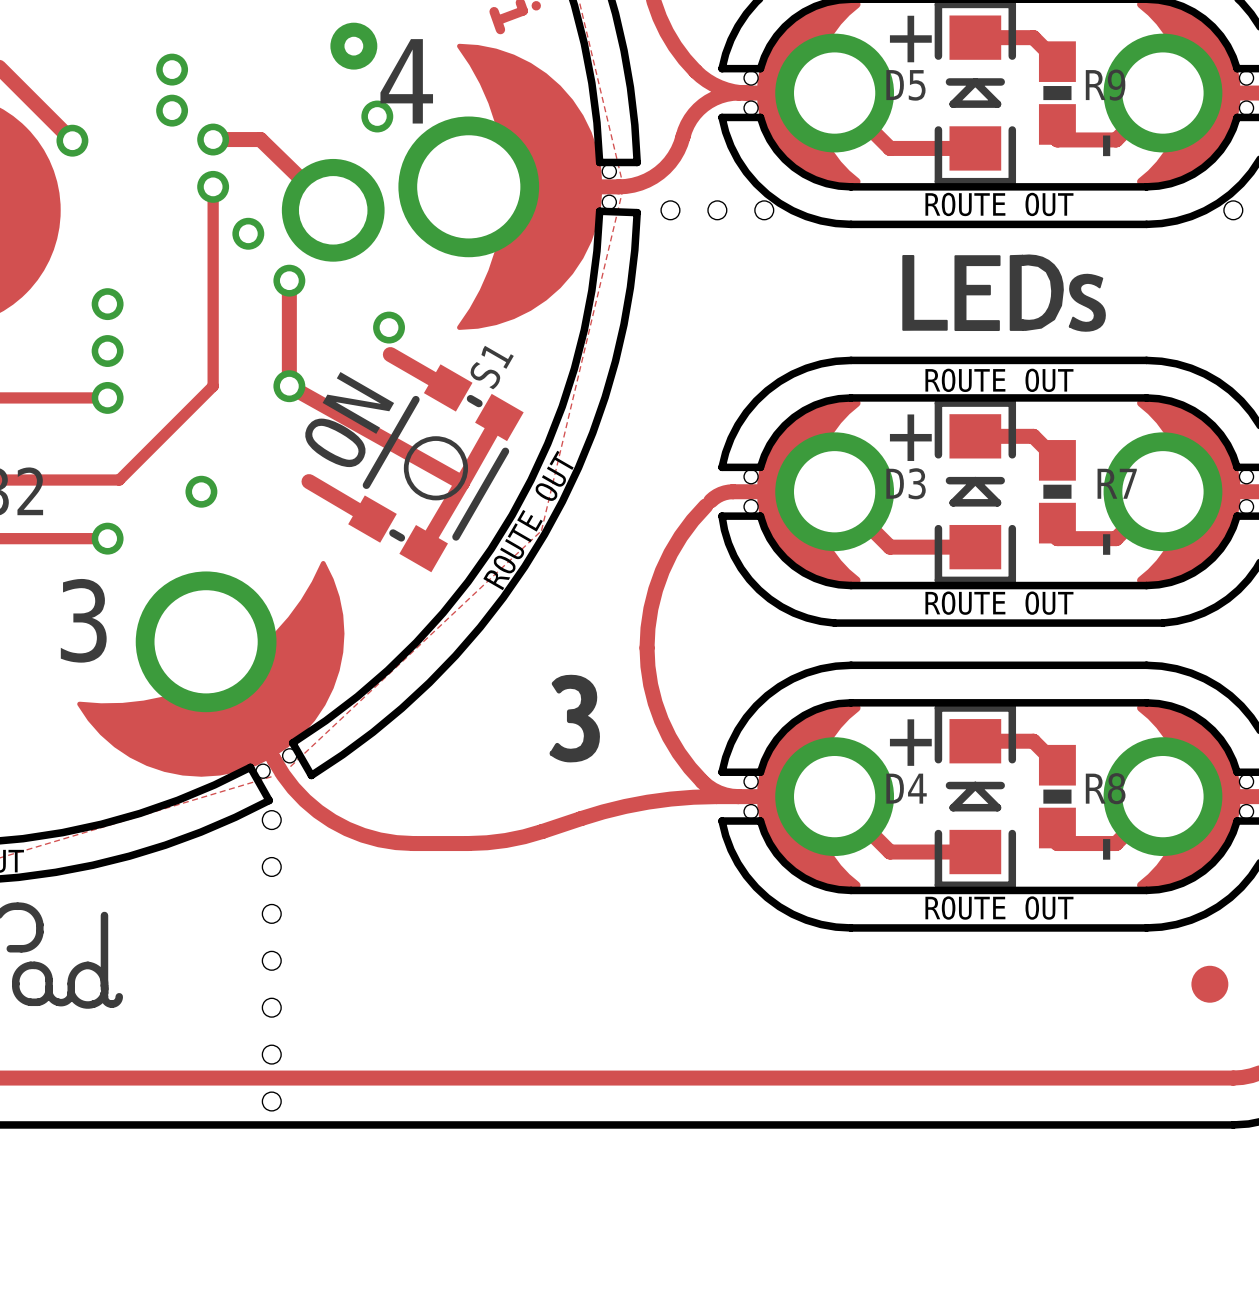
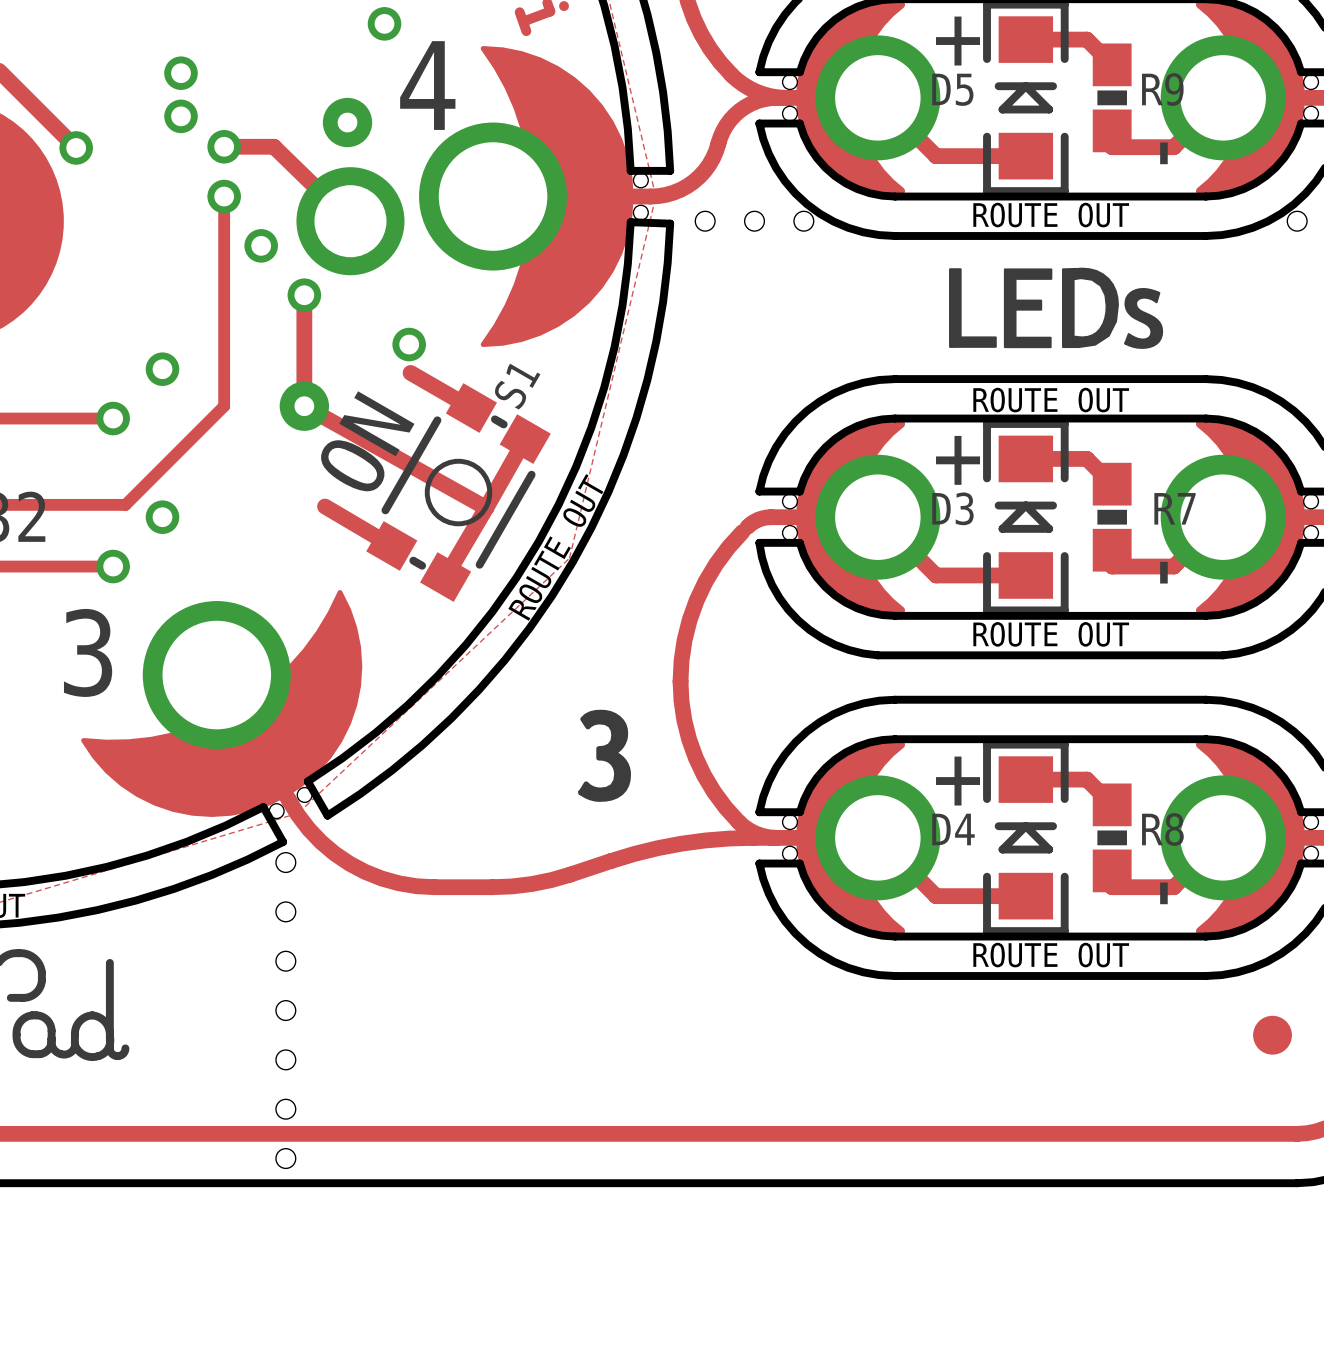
part position: (353, 46) -> (347, 122)
via position: (377, 116) -> (384, 23)
via: (107, 304) -> none
via: (107, 351) -> none
via: none -> (162, 369)
part: none -> (304, 406)
via: (289, 386) -> none
via position: (201, 491) -> (162, 517)

